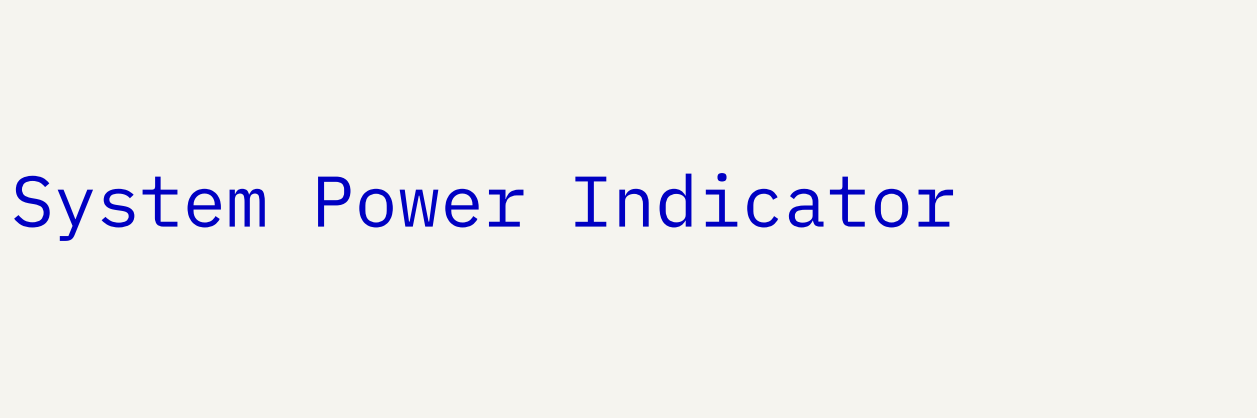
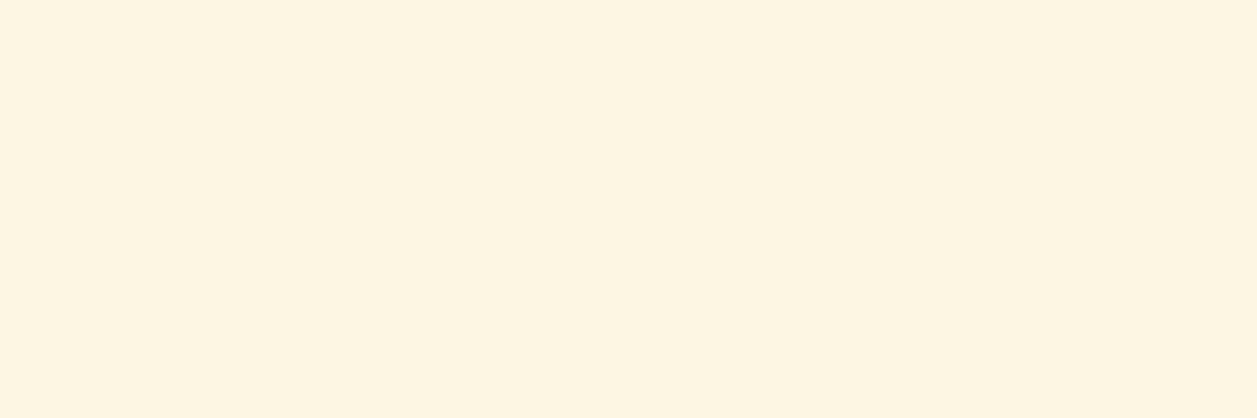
text: System Power Indicator (483, 206) -> none

